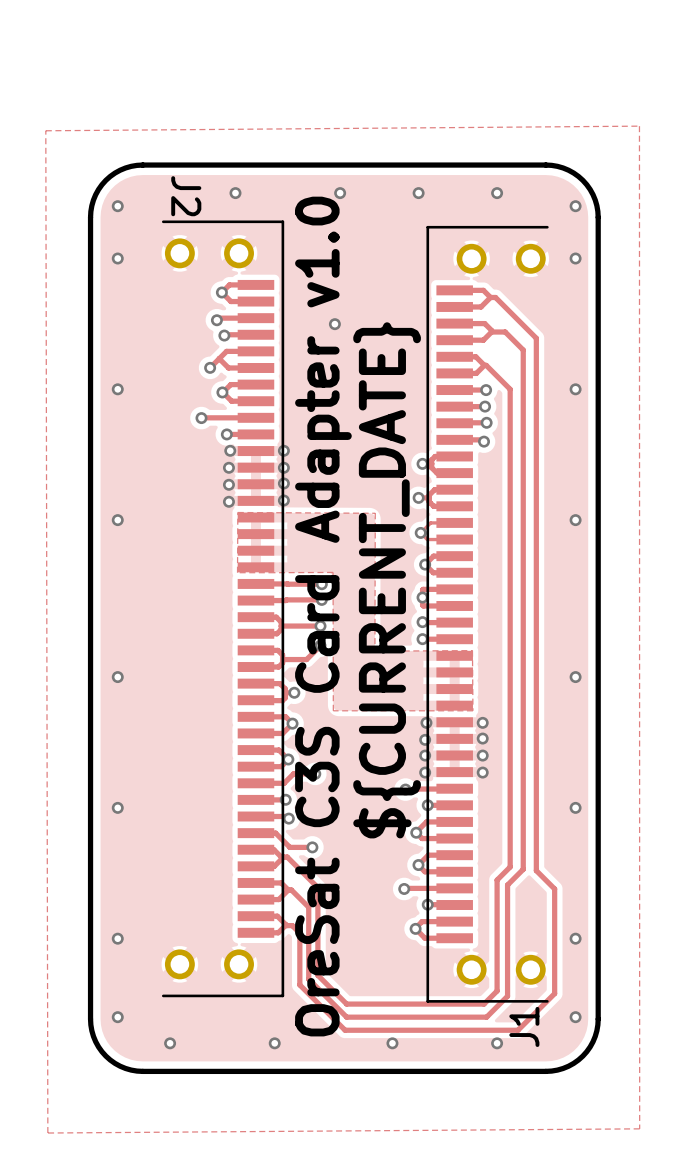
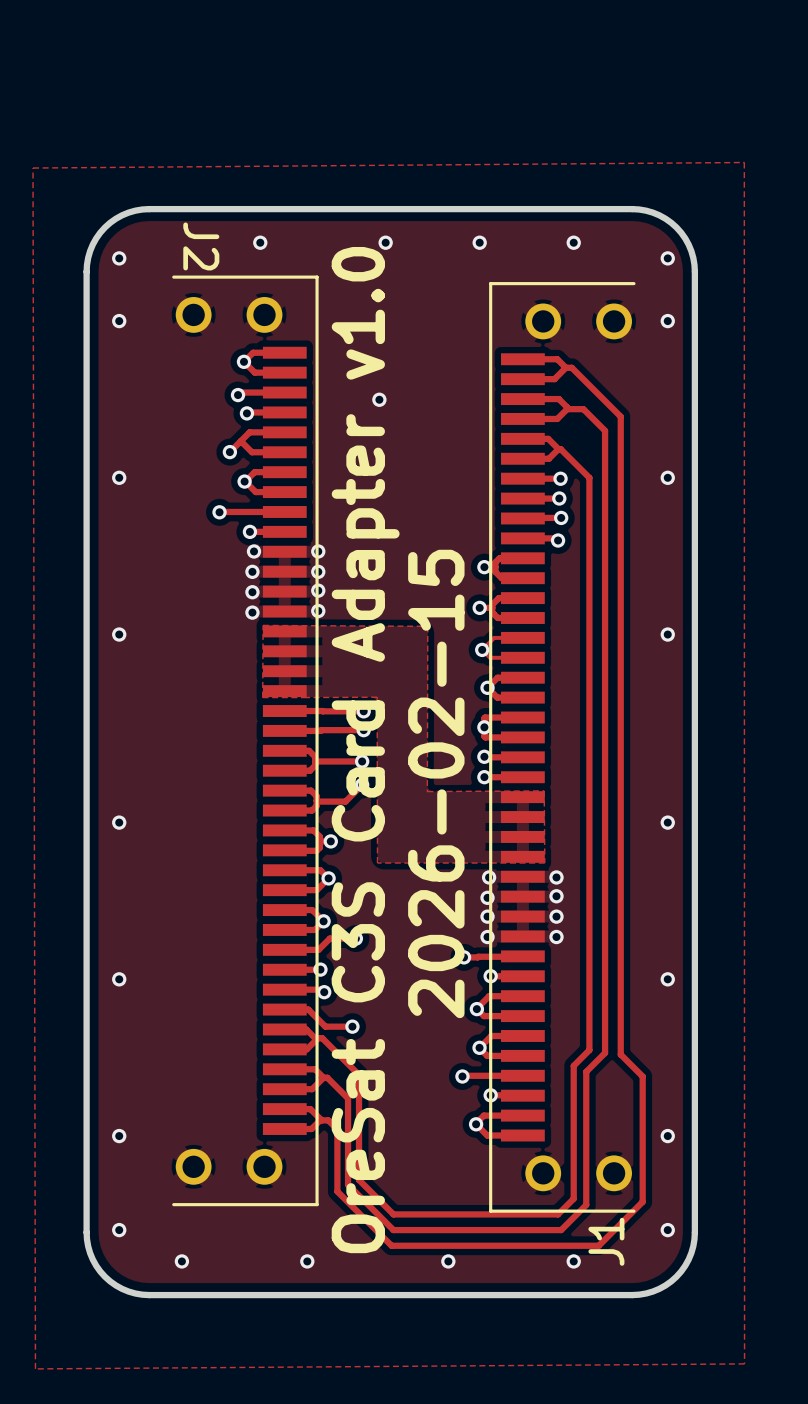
text: ${CURRENT_DATE} (387, 580) -> 2026-02-15 (436, 783)

